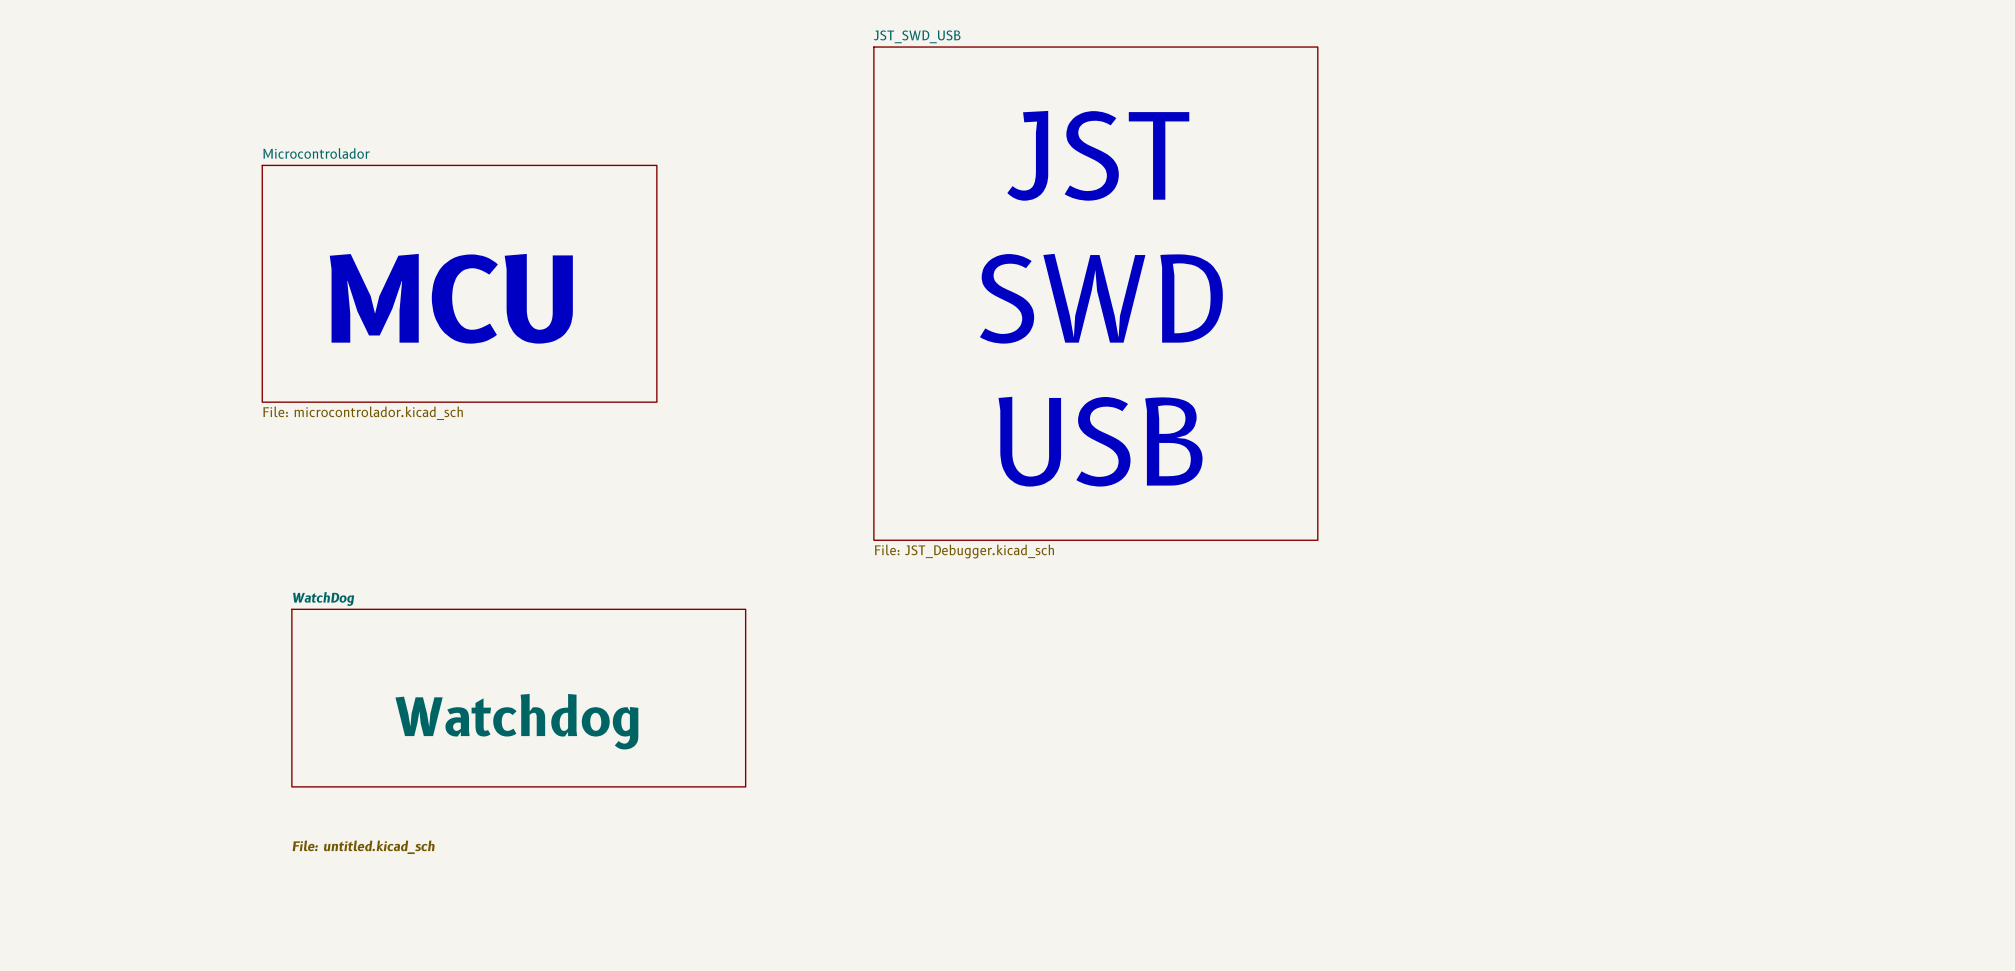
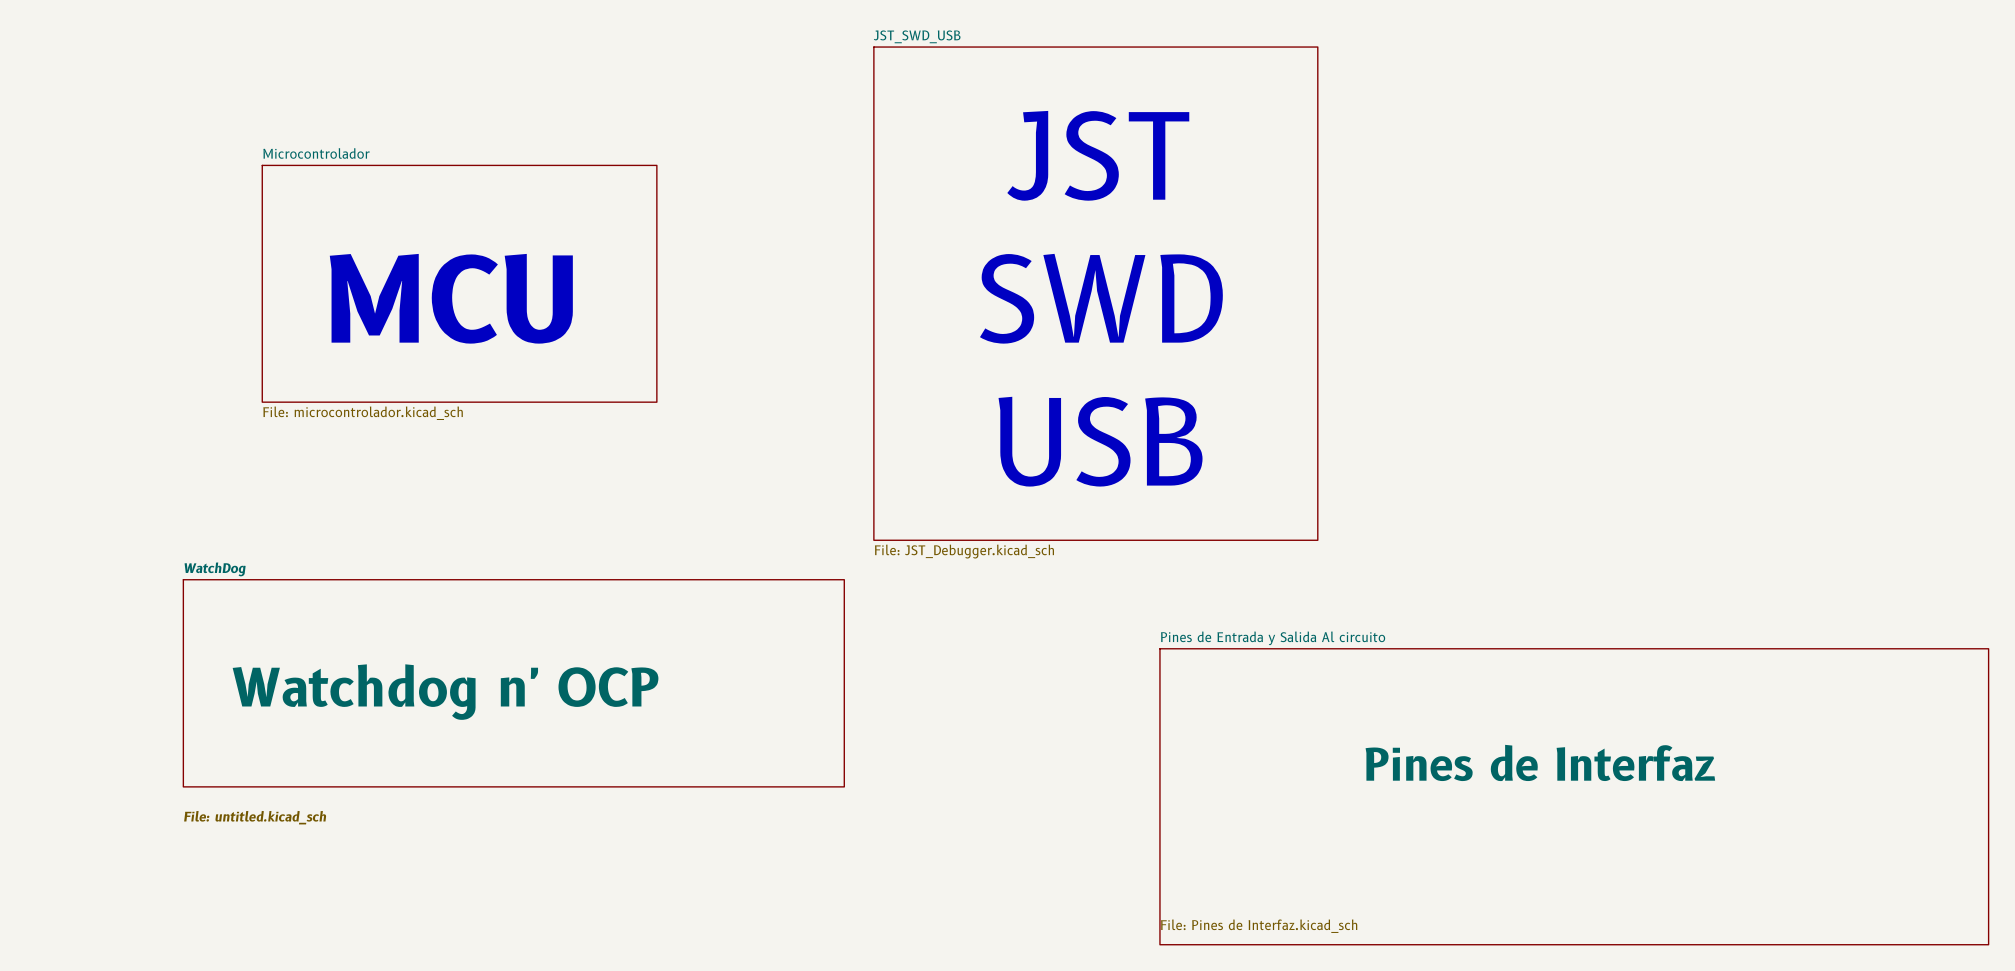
sheet WatchDog: none -> File: untitled.kicad_sch (513, 683)
sheet WatchDog: File: untitled.kicad_sch (518, 698) -> none
sheet Pines de Entrada y Salida Al circuito: none -> File: Pines de Interfaz.kicad_sch (1574, 796)

